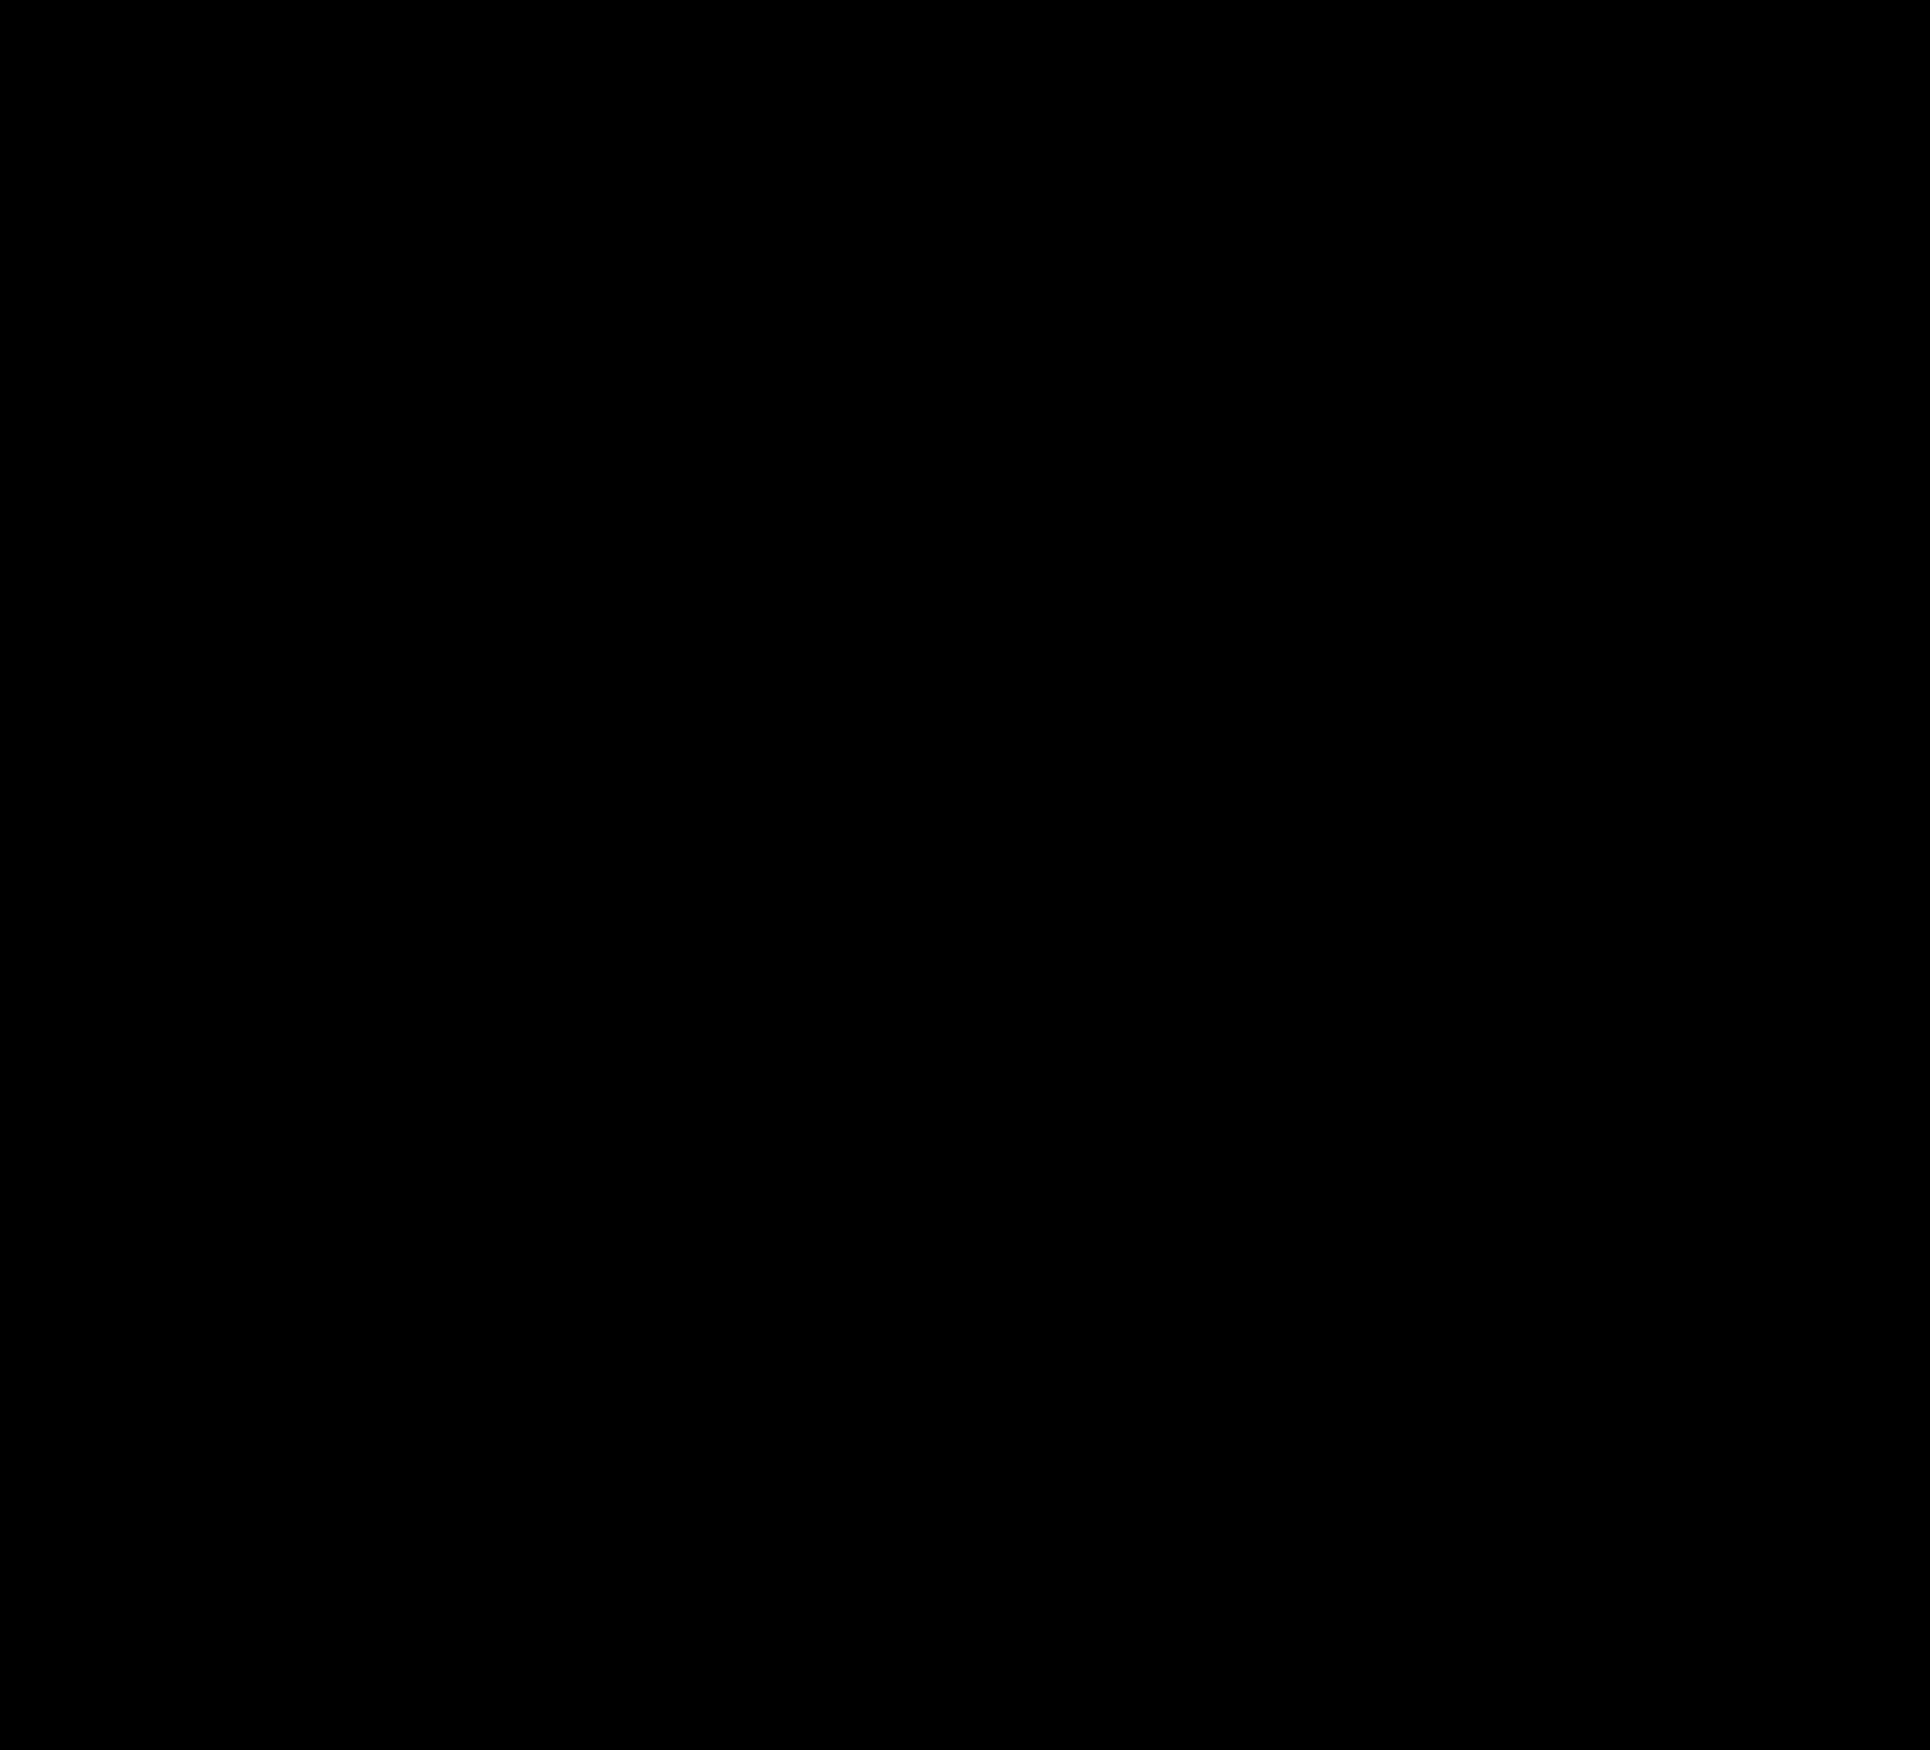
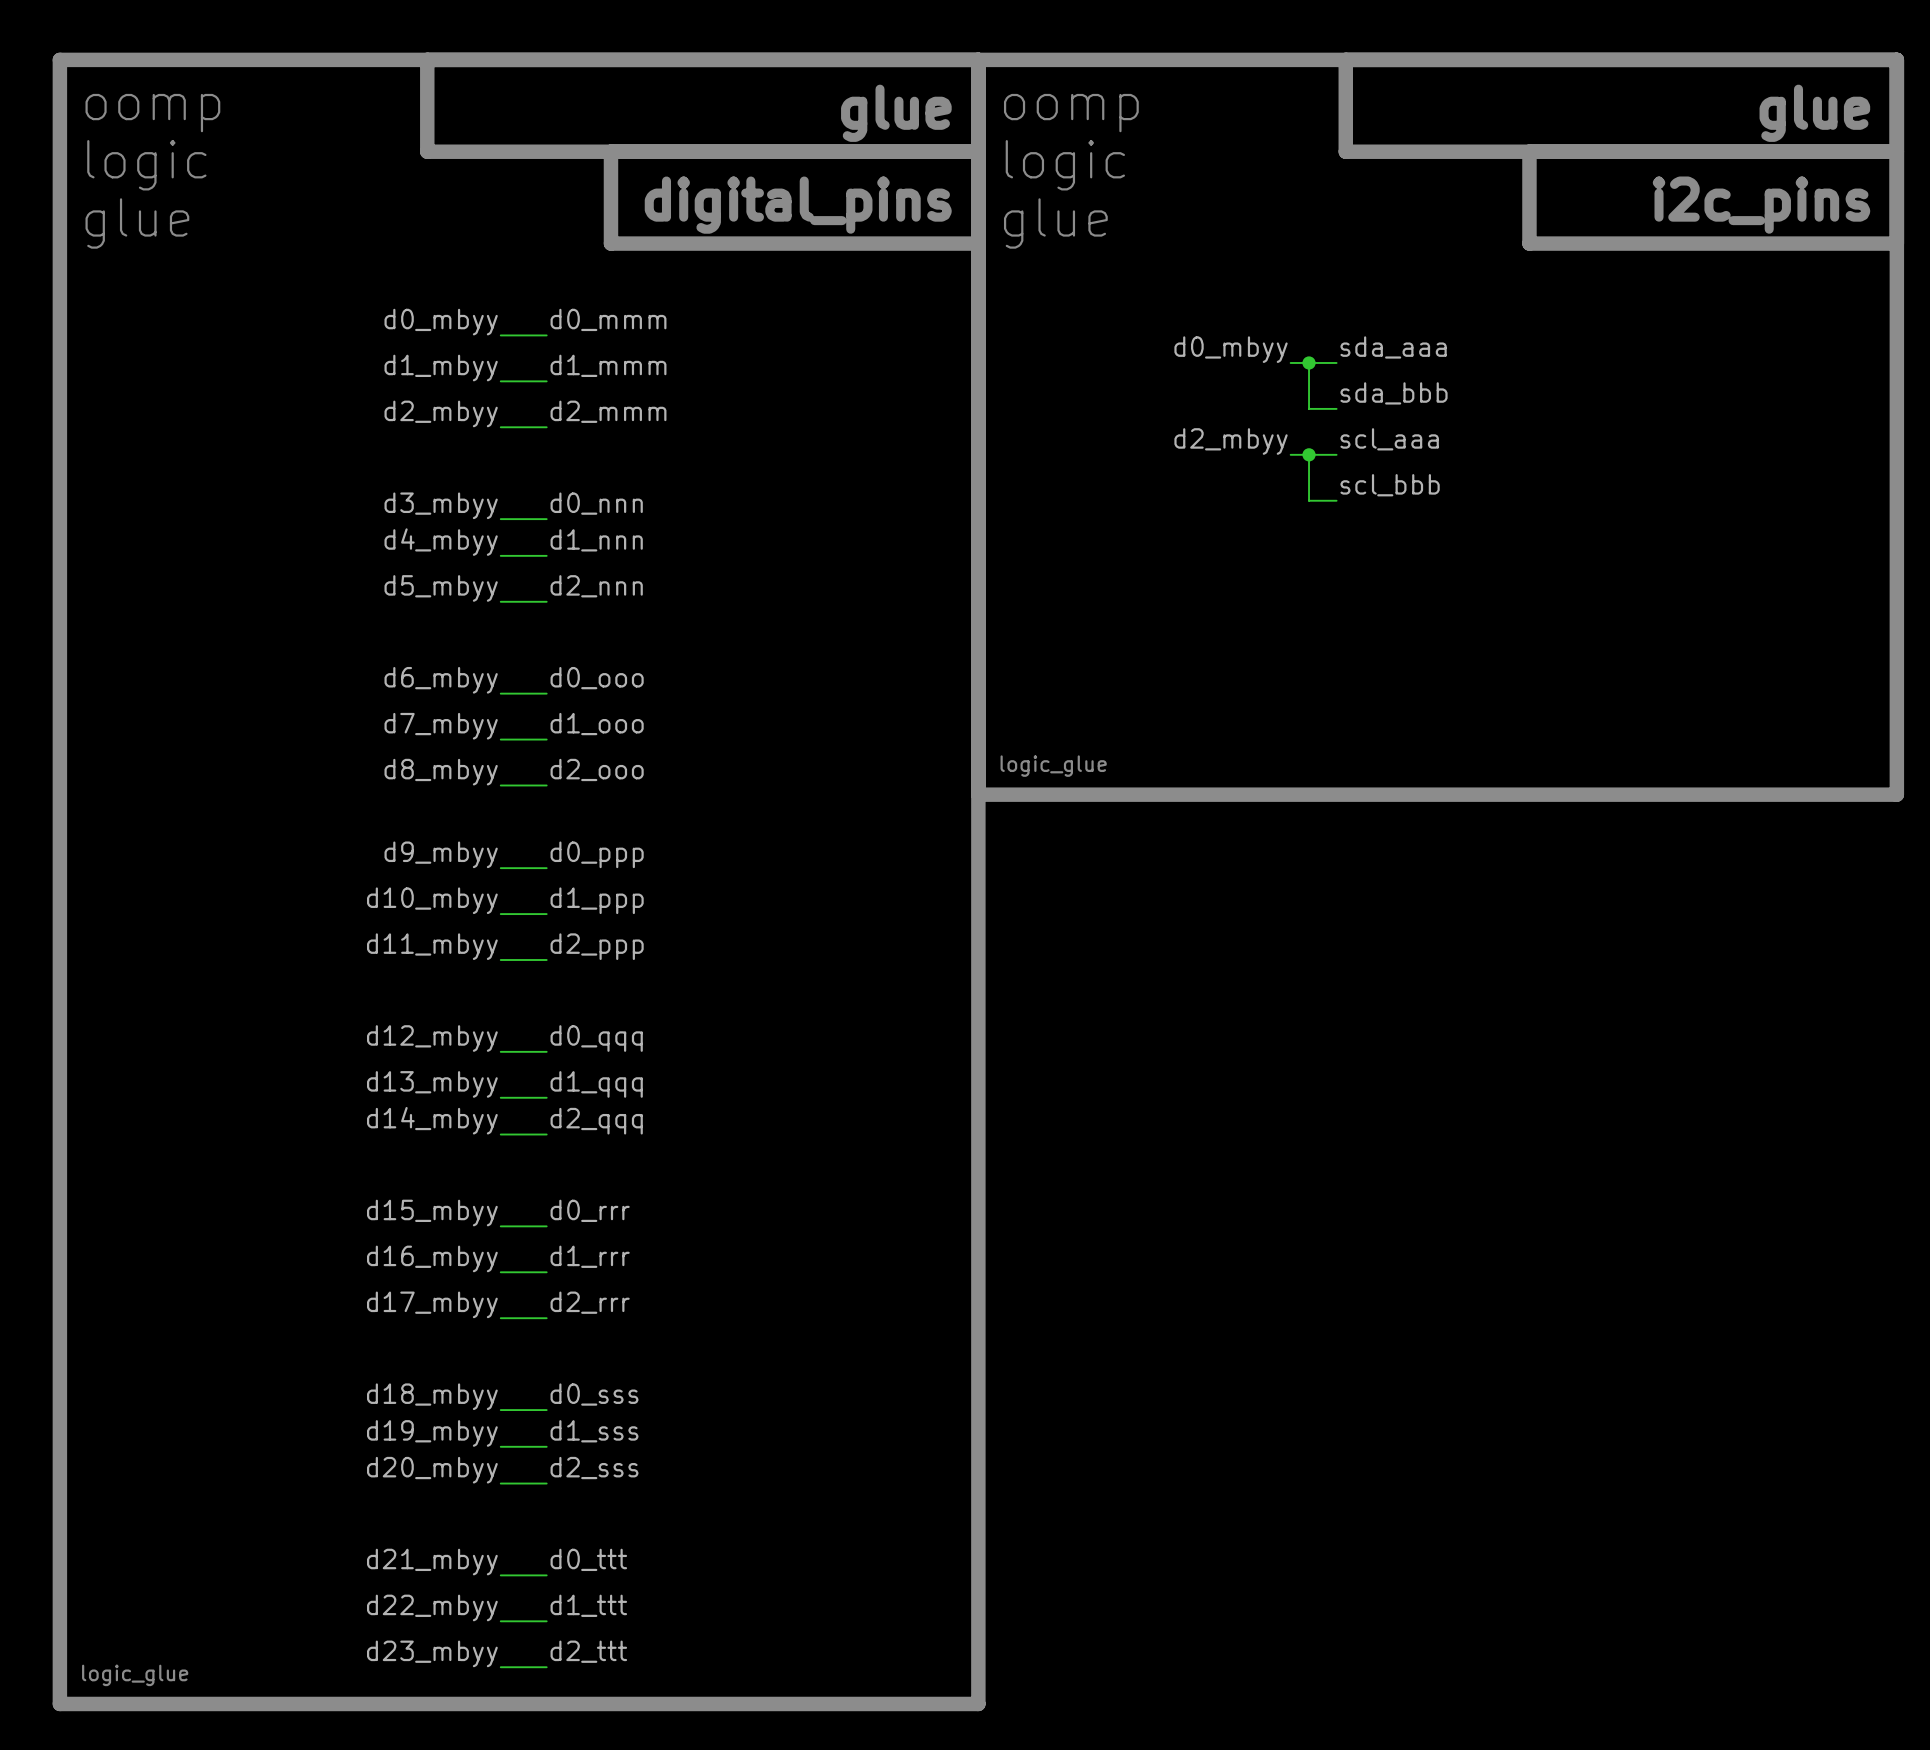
line: none -> (427, 59) (427, 151) (978, 151)
line: none -> (978, 59) (978, 1703) (59, 1703) (59, 59) (1896, 59) (1896, 794) (978, 794)
line: none -> (1345, 59) (1345, 151) (1896, 151)
text: none -> oomp (152, 113)
text: none -> glue (896, 113)
text: none -> oomp (1071, 113)
text: none -> glue (1814, 113)
line: none -> (610, 151) (610, 243) (978, 243)
line: none -> (1529, 151) (1529, 243) (1896, 243)
text: none -> logic (146, 165)
text: none -> logic (1065, 165)
text: none -> digital_pins (798, 205)
text: none -> i2c_pins (1761, 205)
text: none -> glue (137, 223)
text: none -> glue (1055, 223)
label: none -> d0_mmm (608, 319)
label: none -> d0_mbyy (441, 322)
wire: none -> (500, 335) (546, 335)
label: none -> sda_aaa (1393, 347)
label: none -> d0_mbyy (1231, 349)
wire: none -> (1290, 362) (1336, 362)
wire: none -> (1309, 362) (1309, 408) (1336, 408)
junction: none -> (1309, 362)
label: none -> d1_mmm (608, 365)
label: none -> d1_mbyy (441, 368)
wire: none -> (500, 381) (546, 381)
label: none -> sda_bbb (1394, 393)
label: none -> d2_mmm (608, 411)
label: none -> d2_mbyy (441, 413)
wire: none -> (500, 427) (546, 427)
label: none -> scl_aaa (1389, 439)
label: none -> d2_mbyy (1231, 441)
wire: none -> (1290, 454) (1336, 454)
wire: none -> (1309, 454) (1309, 500) (1336, 500)
junction: none -> (1309, 454)
label: none -> scl_bbb (1390, 485)
label: none -> d0_nnn (596, 503)
label: none -> d3_mbyy (441, 505)
wire: none -> (500, 519) (546, 519)
label: none -> d1_nnn (596, 540)
label: none -> d4_mbyy (441, 542)
wire: none -> (500, 555) (546, 555)
label: none -> d2_nnn (596, 586)
label: none -> d5_mbyy (441, 588)
wire: none -> (500, 601) (546, 601)
label: none -> d0_ooo (597, 678)
label: none -> d6_mbyy (441, 680)
wire: none -> (500, 693) (546, 693)
label: none -> d1_ooo (597, 724)
label: none -> d7_mbyy (441, 726)
wire: none -> (500, 739) (546, 739)
text: none -> logic_glue (1053, 766)
label: none -> d2_ooo (597, 769)
label: none -> d8_mbyy (441, 772)
wire: none -> (500, 785) (546, 785)
label: none -> d9_mbyy (441, 854)
label: none -> d0_ppp (597, 854)
wire: none -> (500, 868) (546, 868)
label: none -> d10_mbyy (432, 900)
label: none -> d1_ppp (597, 900)
wire: none -> (500, 914) (546, 914)
label: none -> d11_mbyy (432, 946)
label: none -> d2_ppp (597, 946)
wire: none -> (500, 960) (546, 960)
label: none -> d12_mbyy (432, 1038)
label: none -> d0_qqq (596, 1038)
wire: none -> (500, 1051) (546, 1051)
label: none -> d13_mbyy (432, 1084)
label: none -> d1_qqq (596, 1084)
wire: none -> (500, 1097) (546, 1097)
label: none -> d14_mbyy (432, 1120)
label: none -> d2_qqq (596, 1121)
wire: none -> (500, 1134) (546, 1134)
label: none -> d0_rrr (590, 1210)
label: none -> d15_mbyy (432, 1213)
wire: none -> (500, 1226) (546, 1226)
label: none -> d1_rrr (590, 1256)
label: none -> d16_mbyy (432, 1258)
wire: none -> (500, 1272) (546, 1272)
label: none -> d2_rrr (590, 1302)
label: none -> d17_mbyy (432, 1304)
wire: none -> (500, 1318) (546, 1318)
label: none -> d0_sss (594, 1394)
label: none -> d18_mbyy (432, 1396)
wire: none -> (500, 1410) (546, 1410)
label: none -> d1_sss (594, 1431)
label: none -> d19_mbyy (432, 1433)
wire: none -> (500, 1446) (546, 1446)
label: none -> d2_sss (594, 1468)
label: none -> d20_mbyy (432, 1470)
wire: none -> (500, 1483) (546, 1483)
label: none -> d0_ttt (588, 1559)
label: none -> d21_mbyy (432, 1562)
wire: none -> (500, 1575) (546, 1575)
label: none -> d1_ttt (588, 1605)
label: none -> d22_mbyy (432, 1607)
wire: none -> (500, 1621) (546, 1621)
label: none -> d2_ttt (588, 1651)
label: none -> d23_mbyy (432, 1653)
wire: none -> (500, 1667) (546, 1667)
text: none -> logic_glue (135, 1675)

